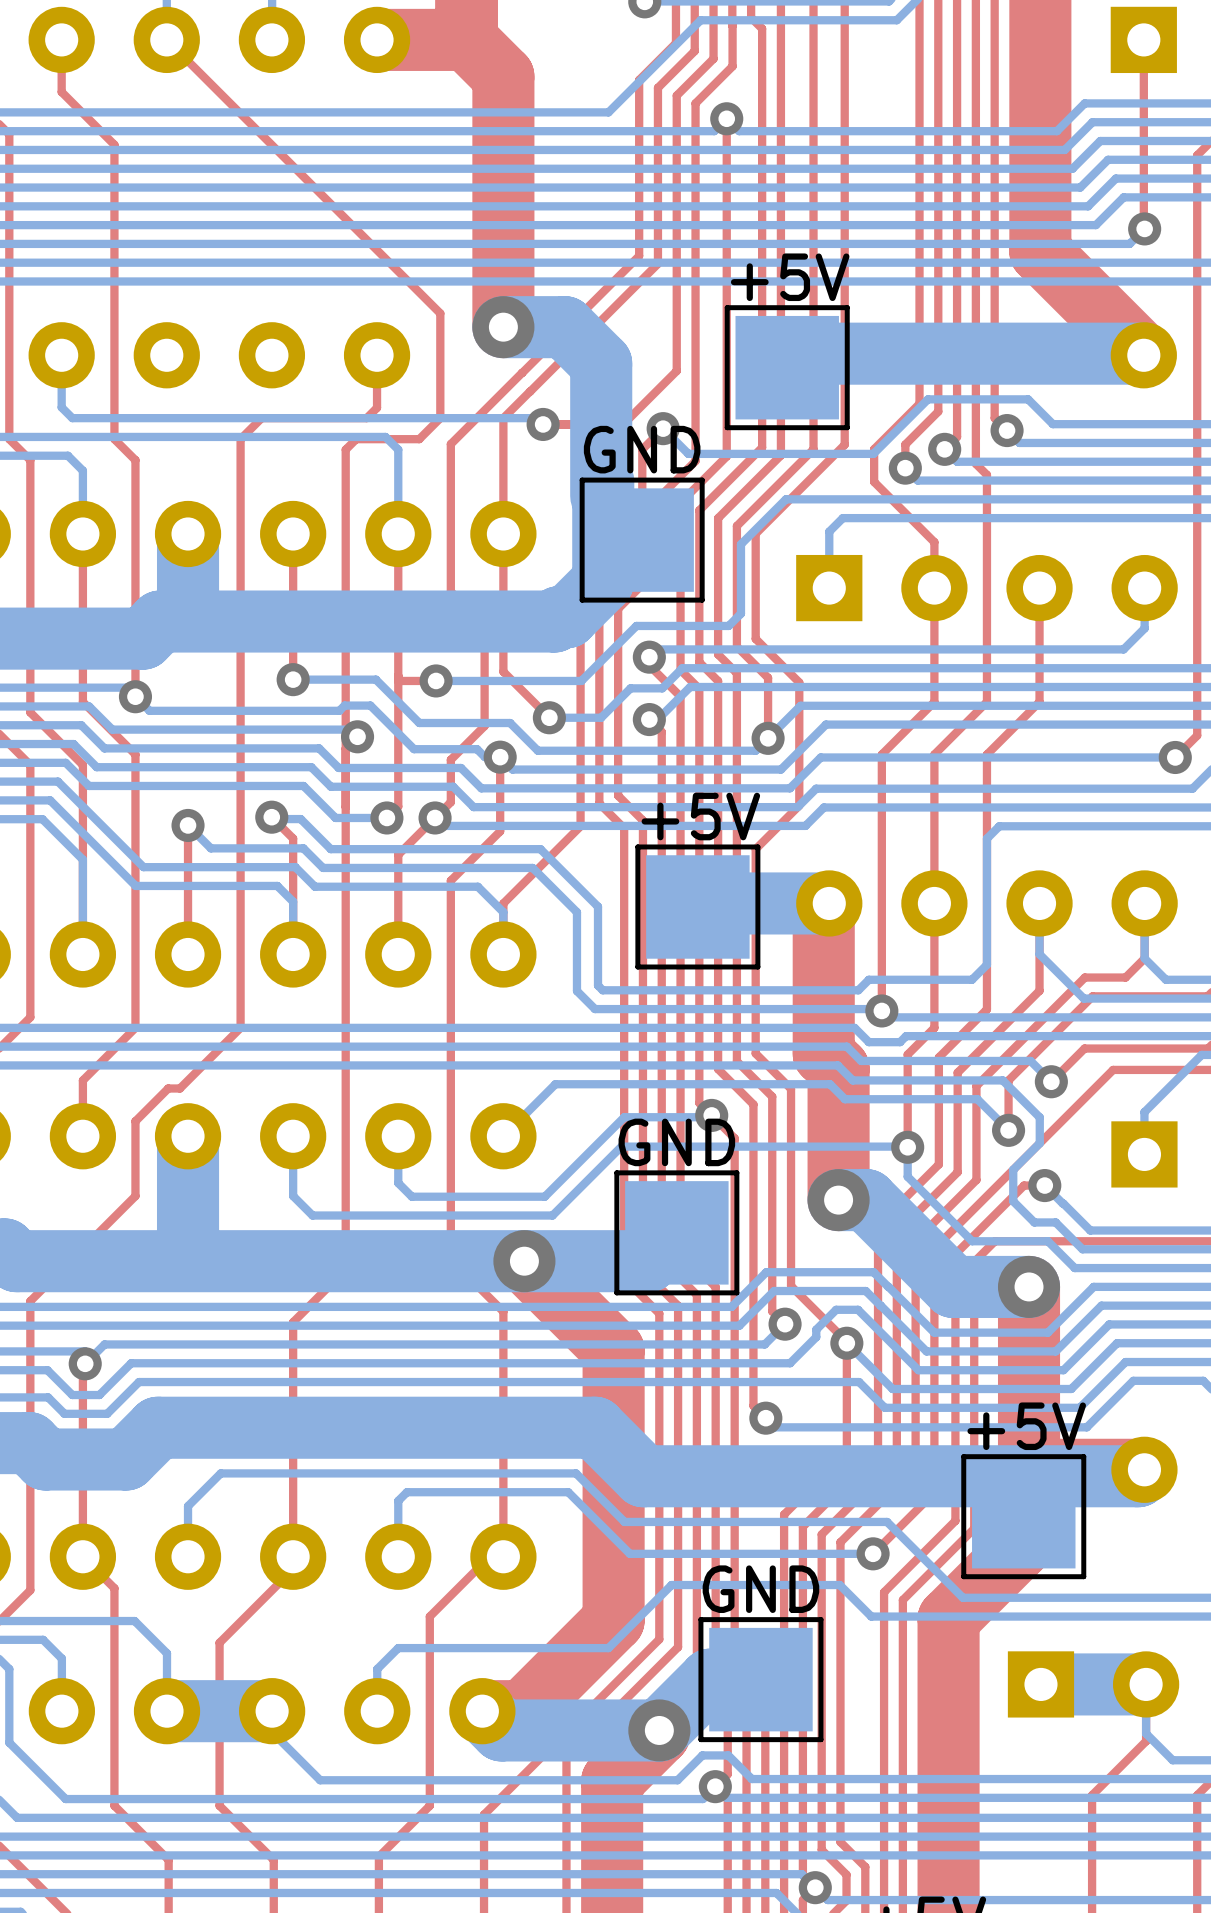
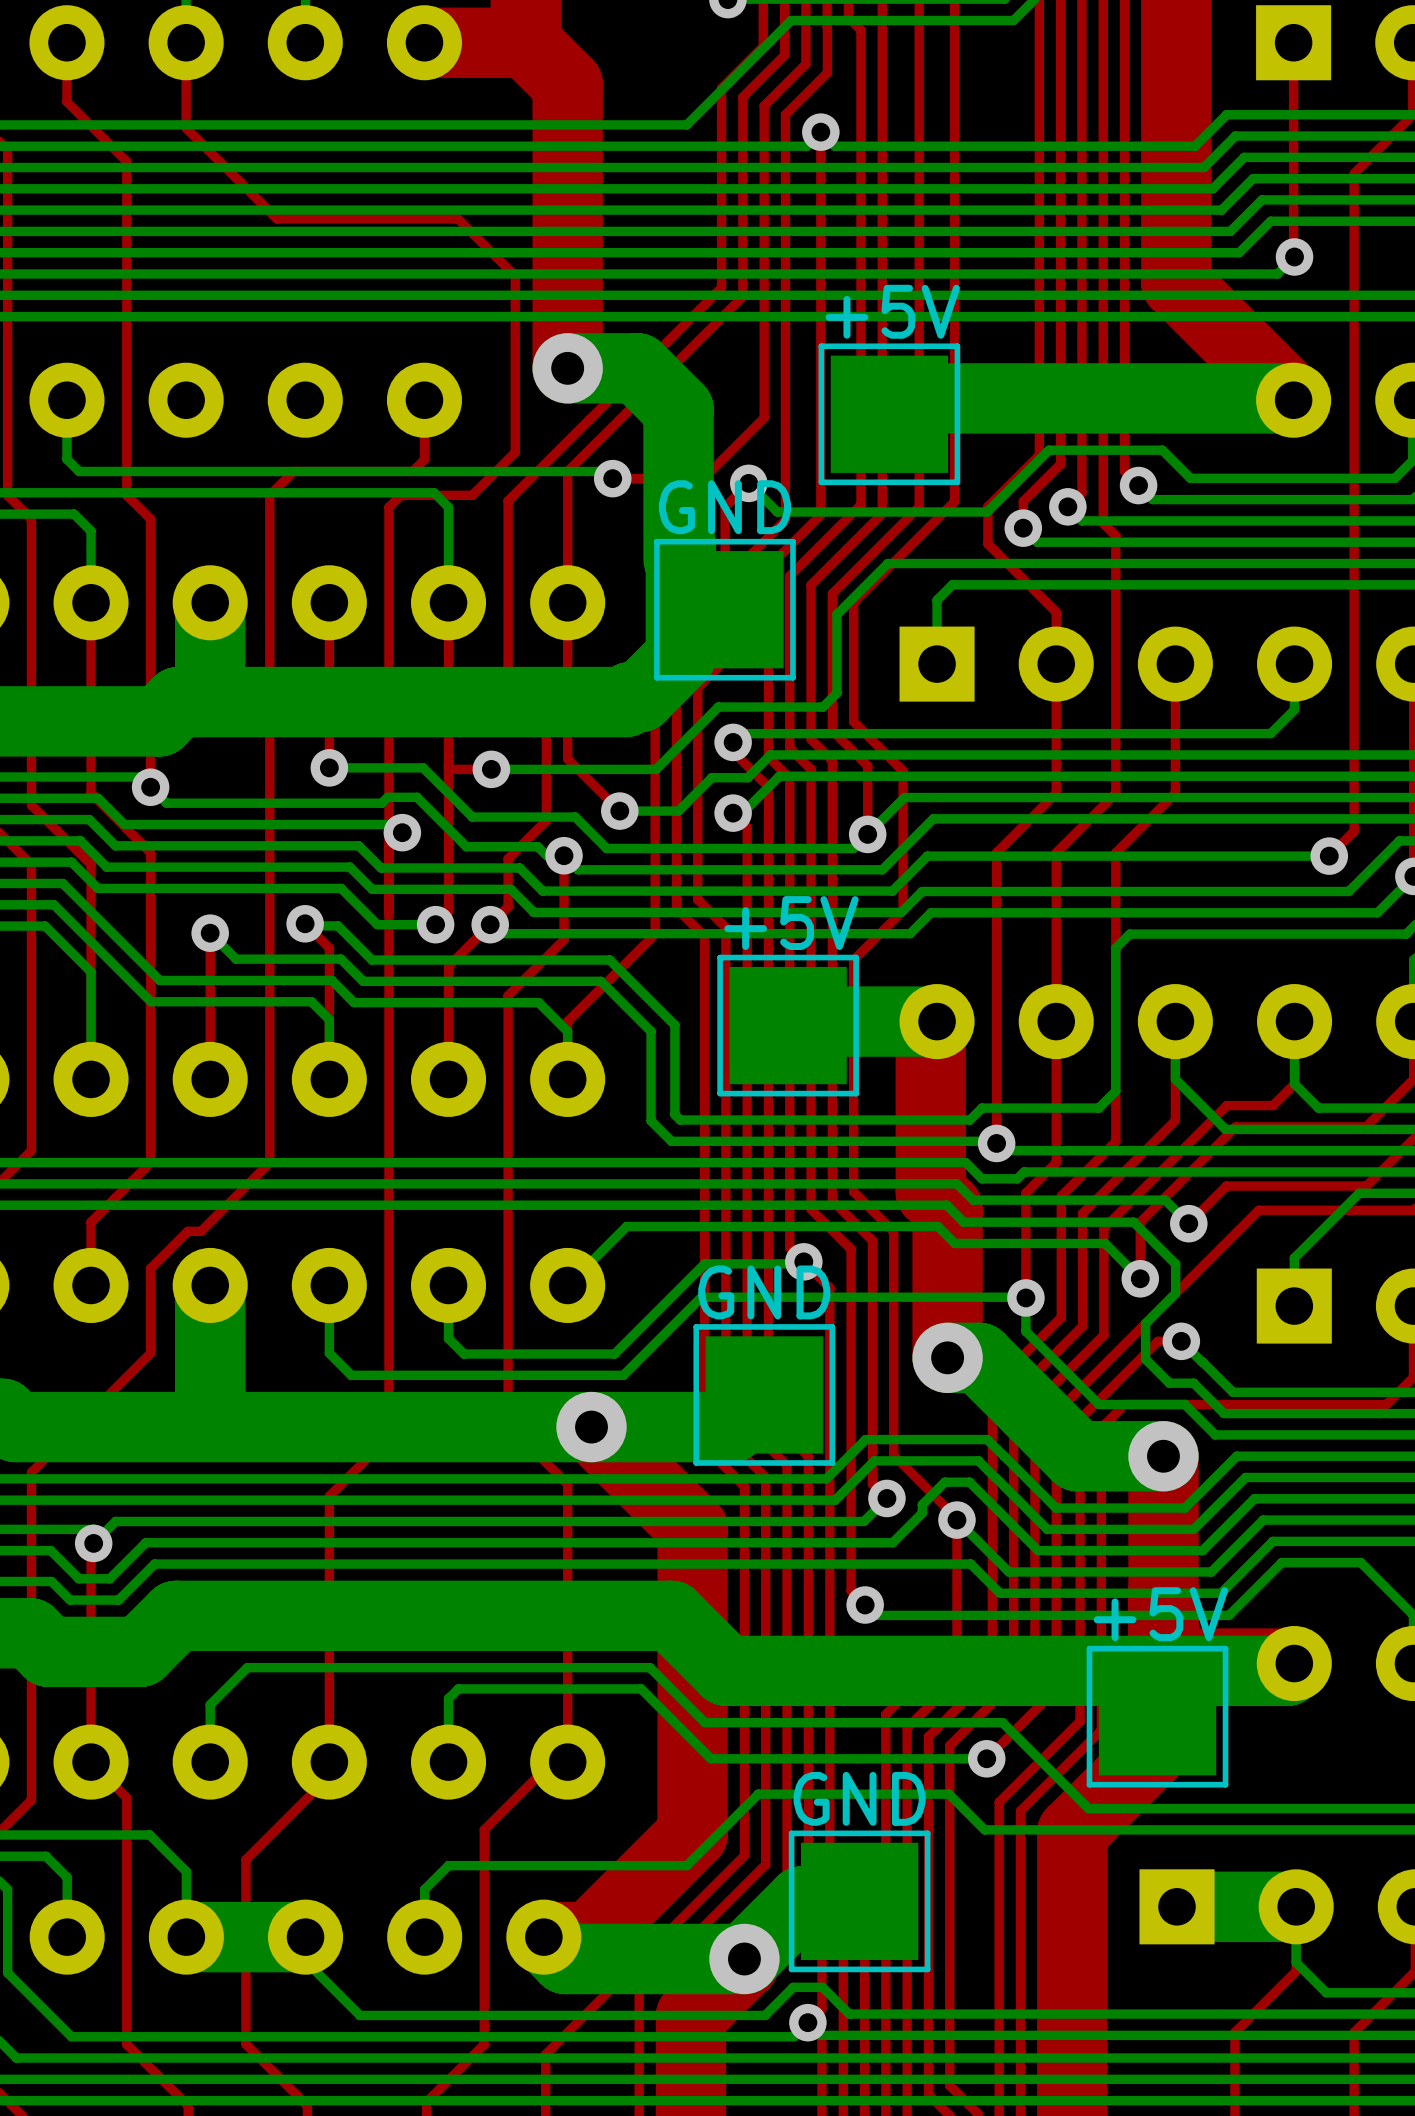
top track: (166, 39) (440, 313) (440, 418) -> (186, 42) (186, 128) (276, 218) (458, 218) (515, 276) (515, 452) (496, 471)

